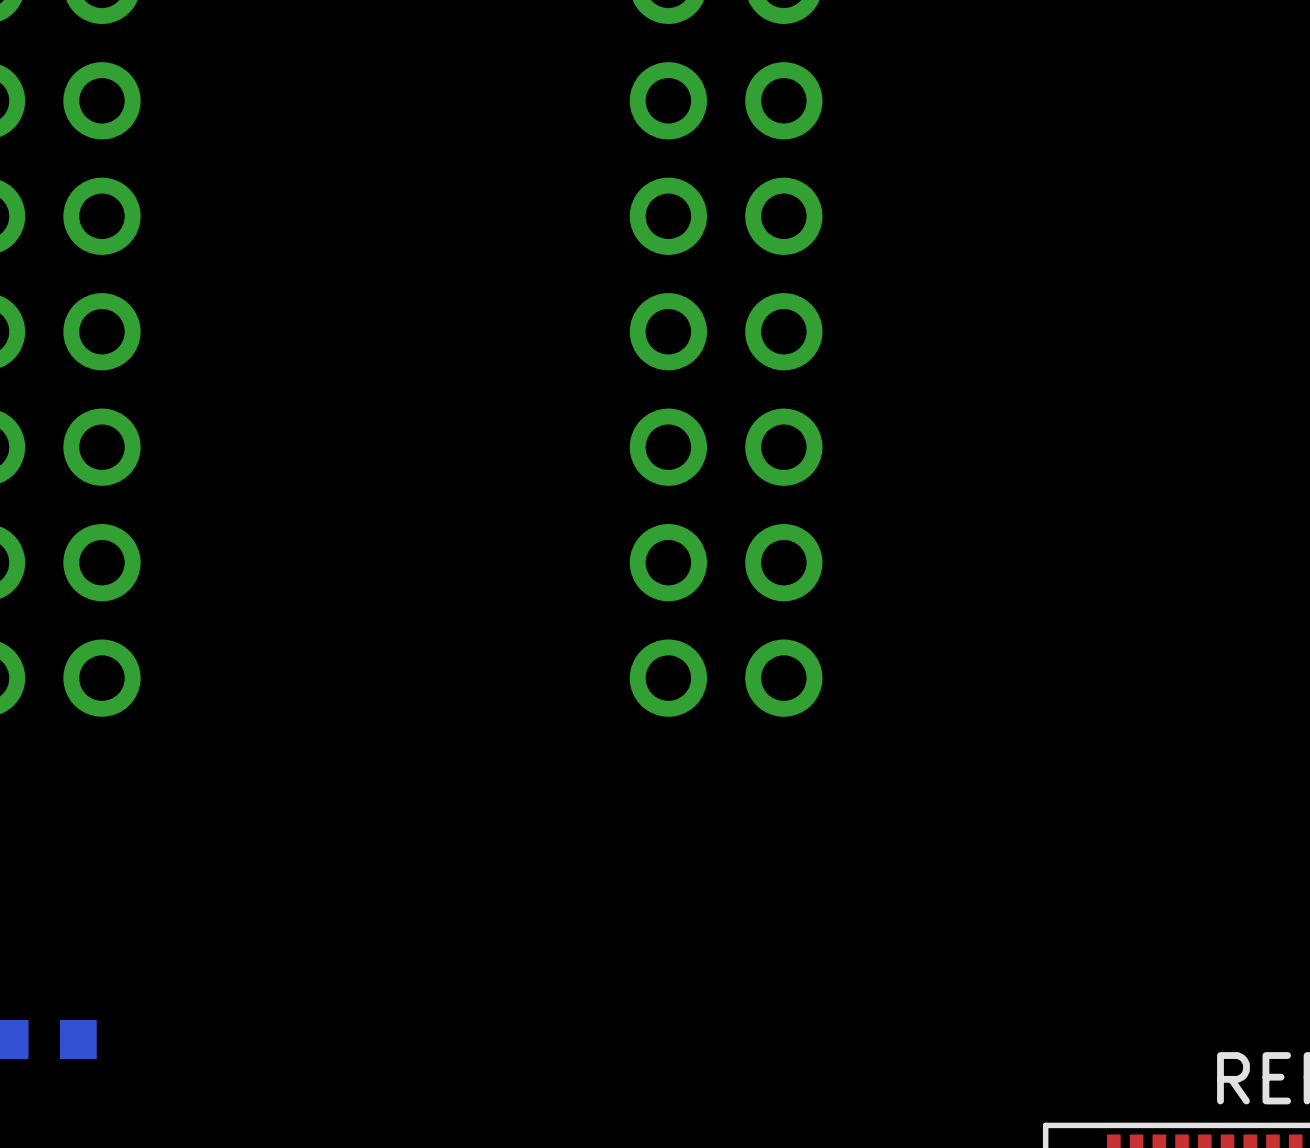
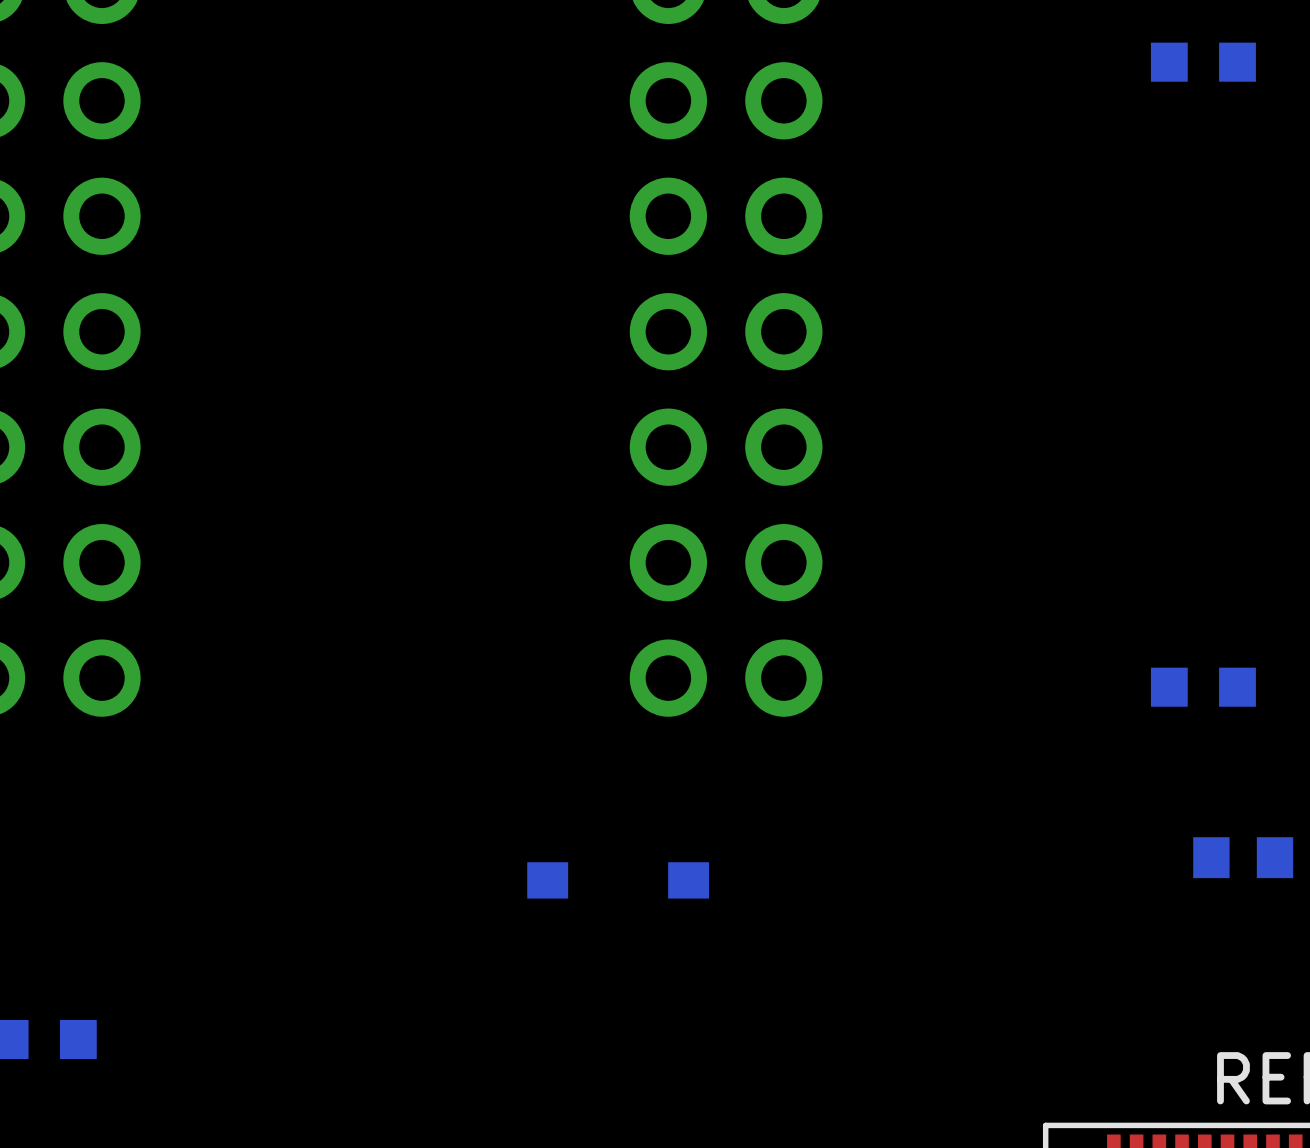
part: none -> (1203, 62)
part: none -> (1203, 687)
part: none -> (1243, 857)
part: none -> (618, 880)

